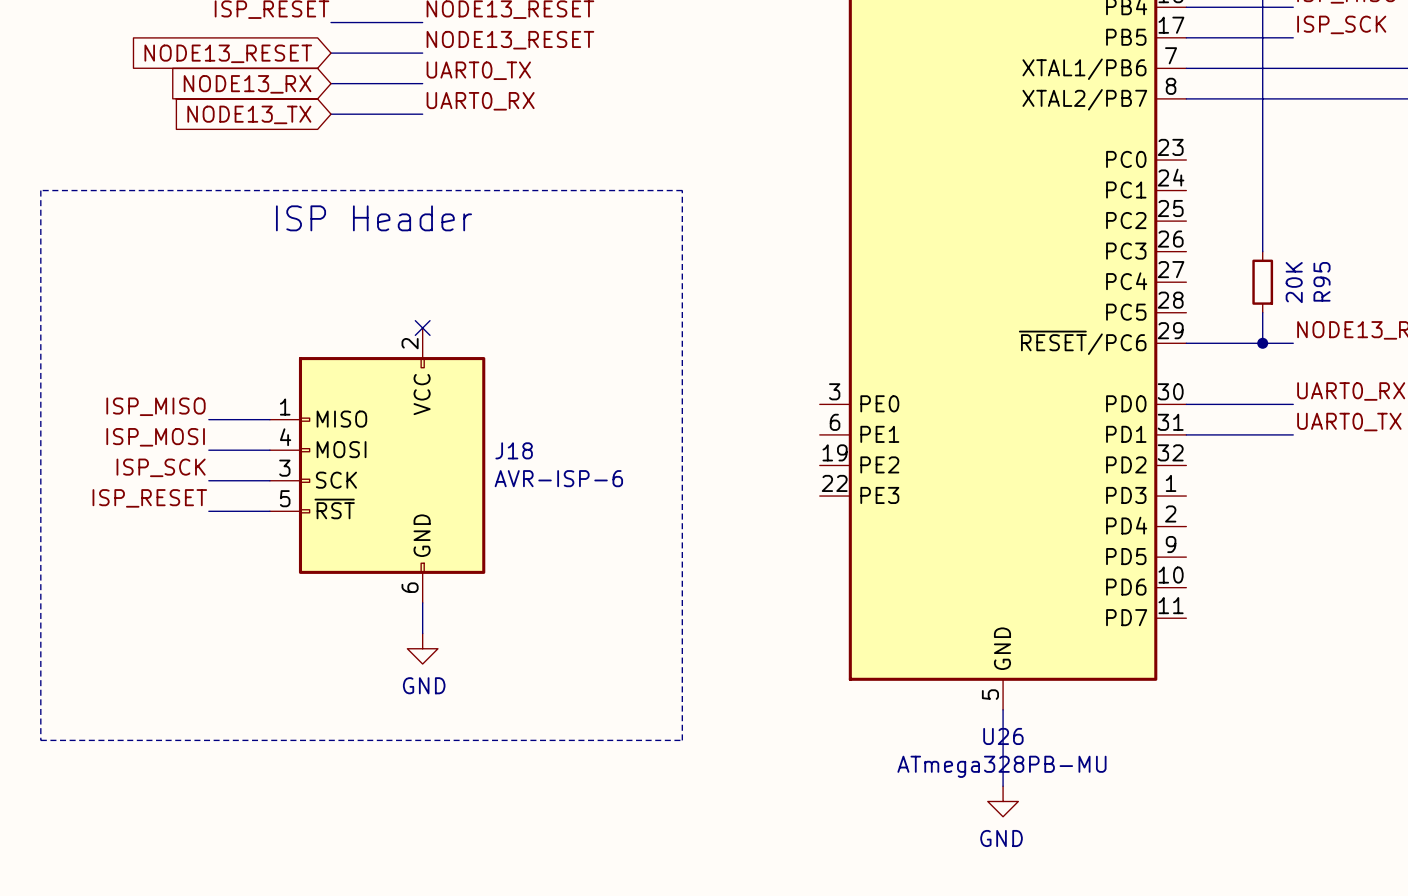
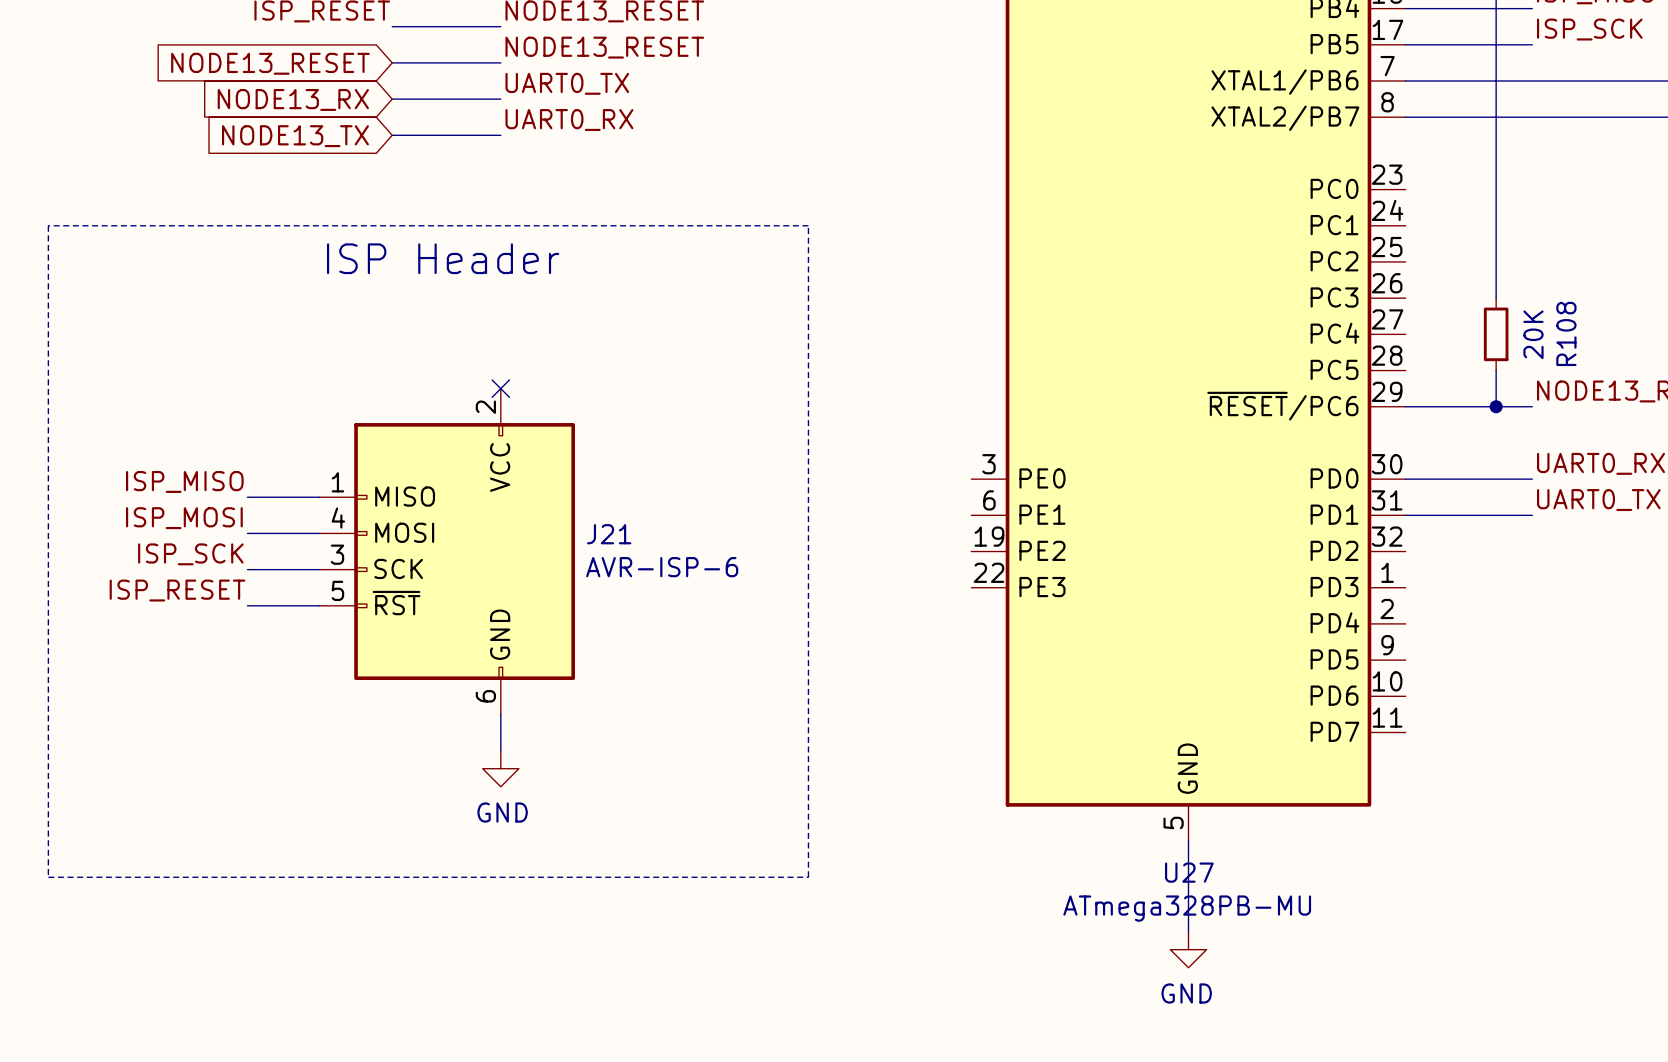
R95 name: R95 (1322, 281) -> R108 (1566, 333)
J18 name: J18 (514, 450) -> J21 (609, 534)
U26 name: U26 (1003, 736) -> U27 (1189, 872)

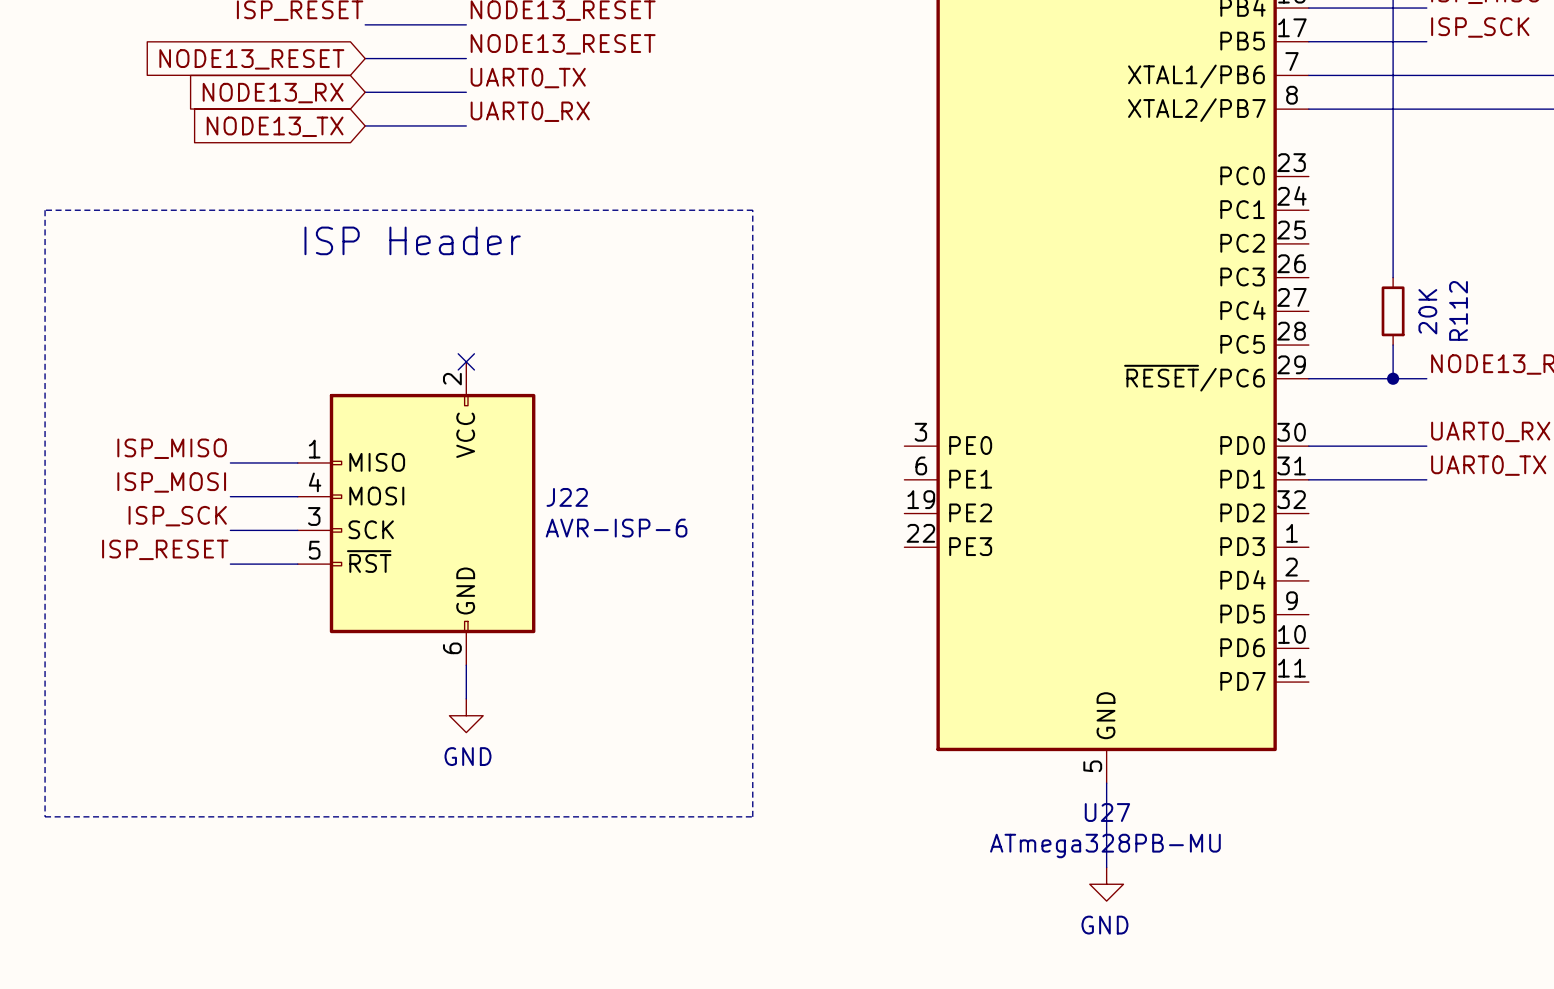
R108 name: R108 (1566, 333) -> R112 (1458, 310)
J21 name: J21 (609, 534) -> J22 (567, 497)

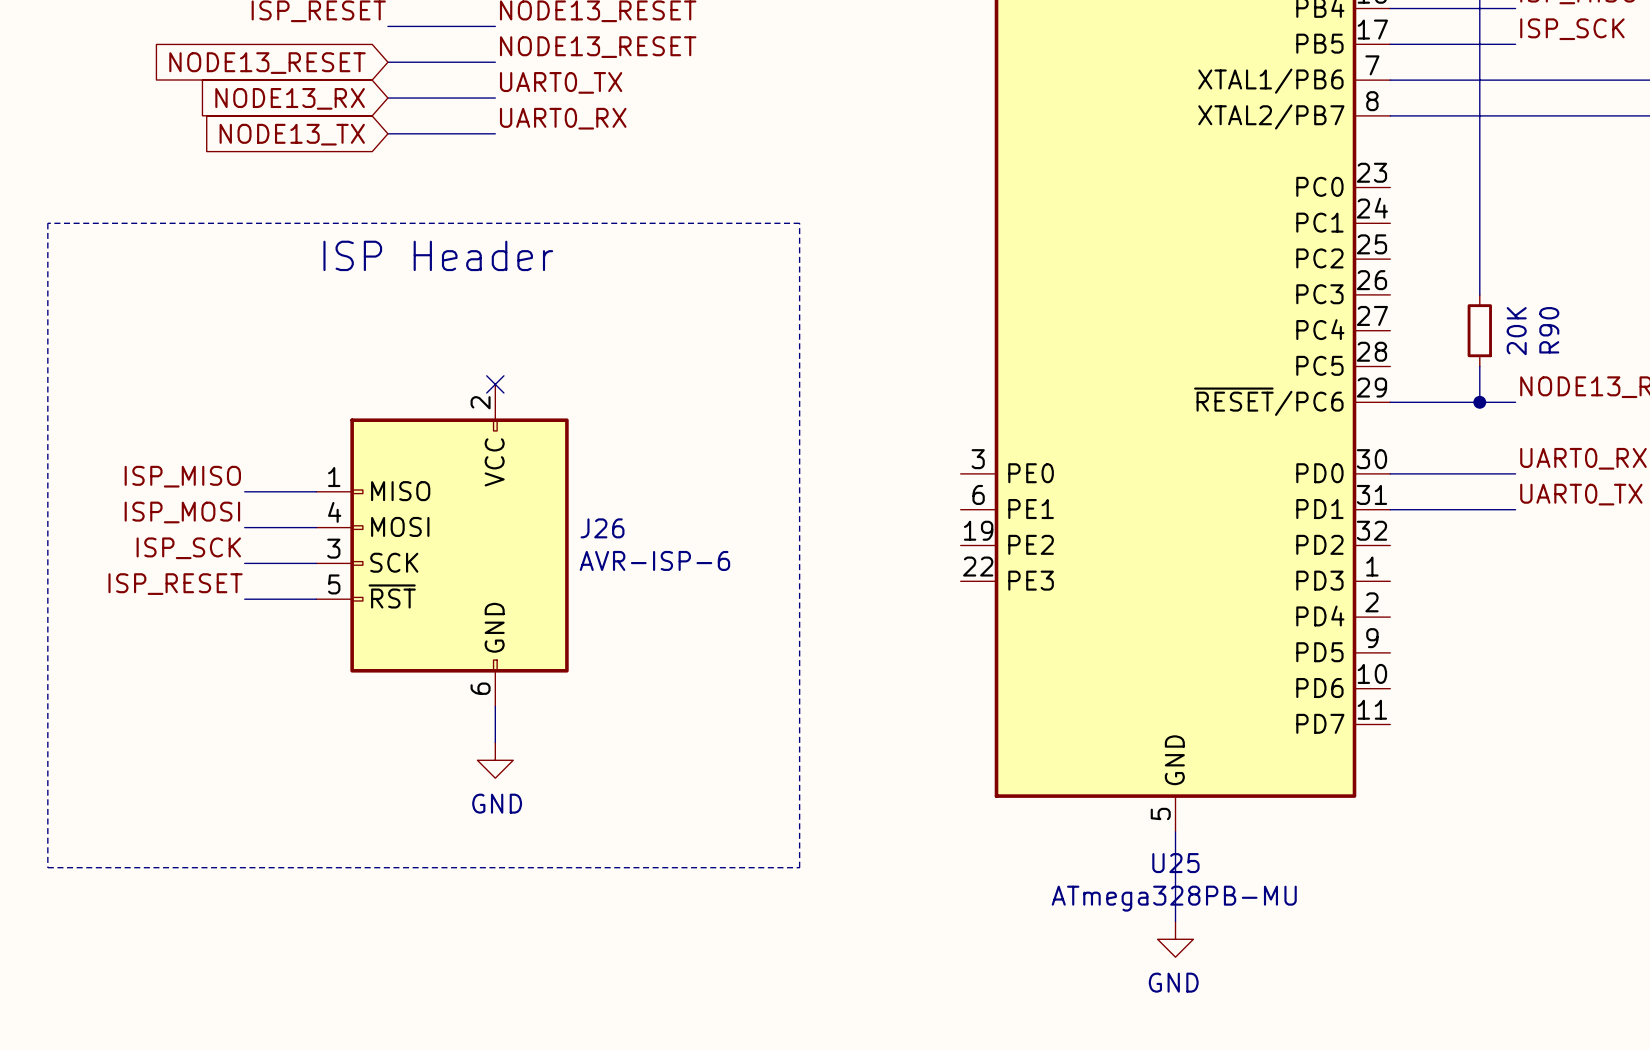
R112 name: R112 (1458, 310) -> R90 (1549, 330)
J22 name: J22 (567, 497) -> J26 (602, 528)
U27 name: U27 (1107, 812) -> U25 (1175, 863)

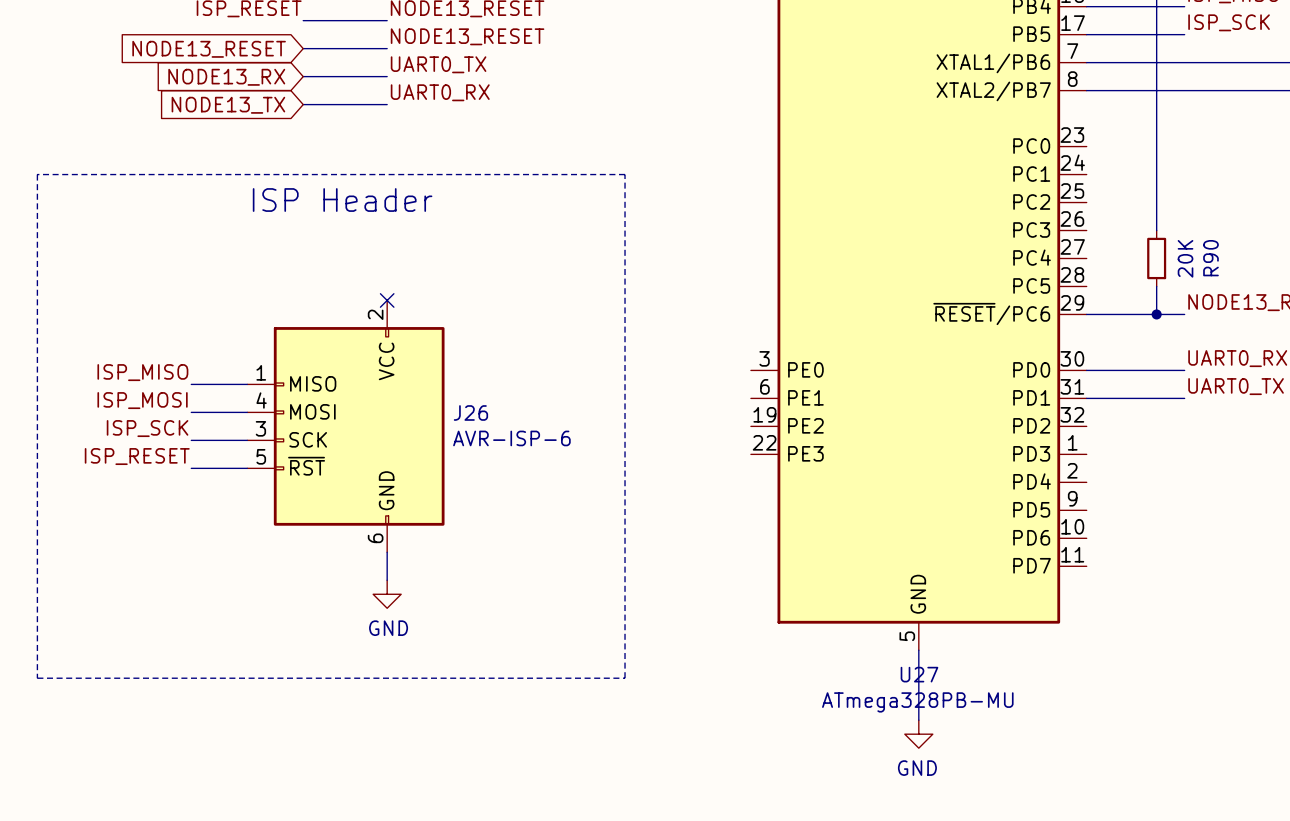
U25 name: U25 (1175, 863) -> U27 (919, 674)

